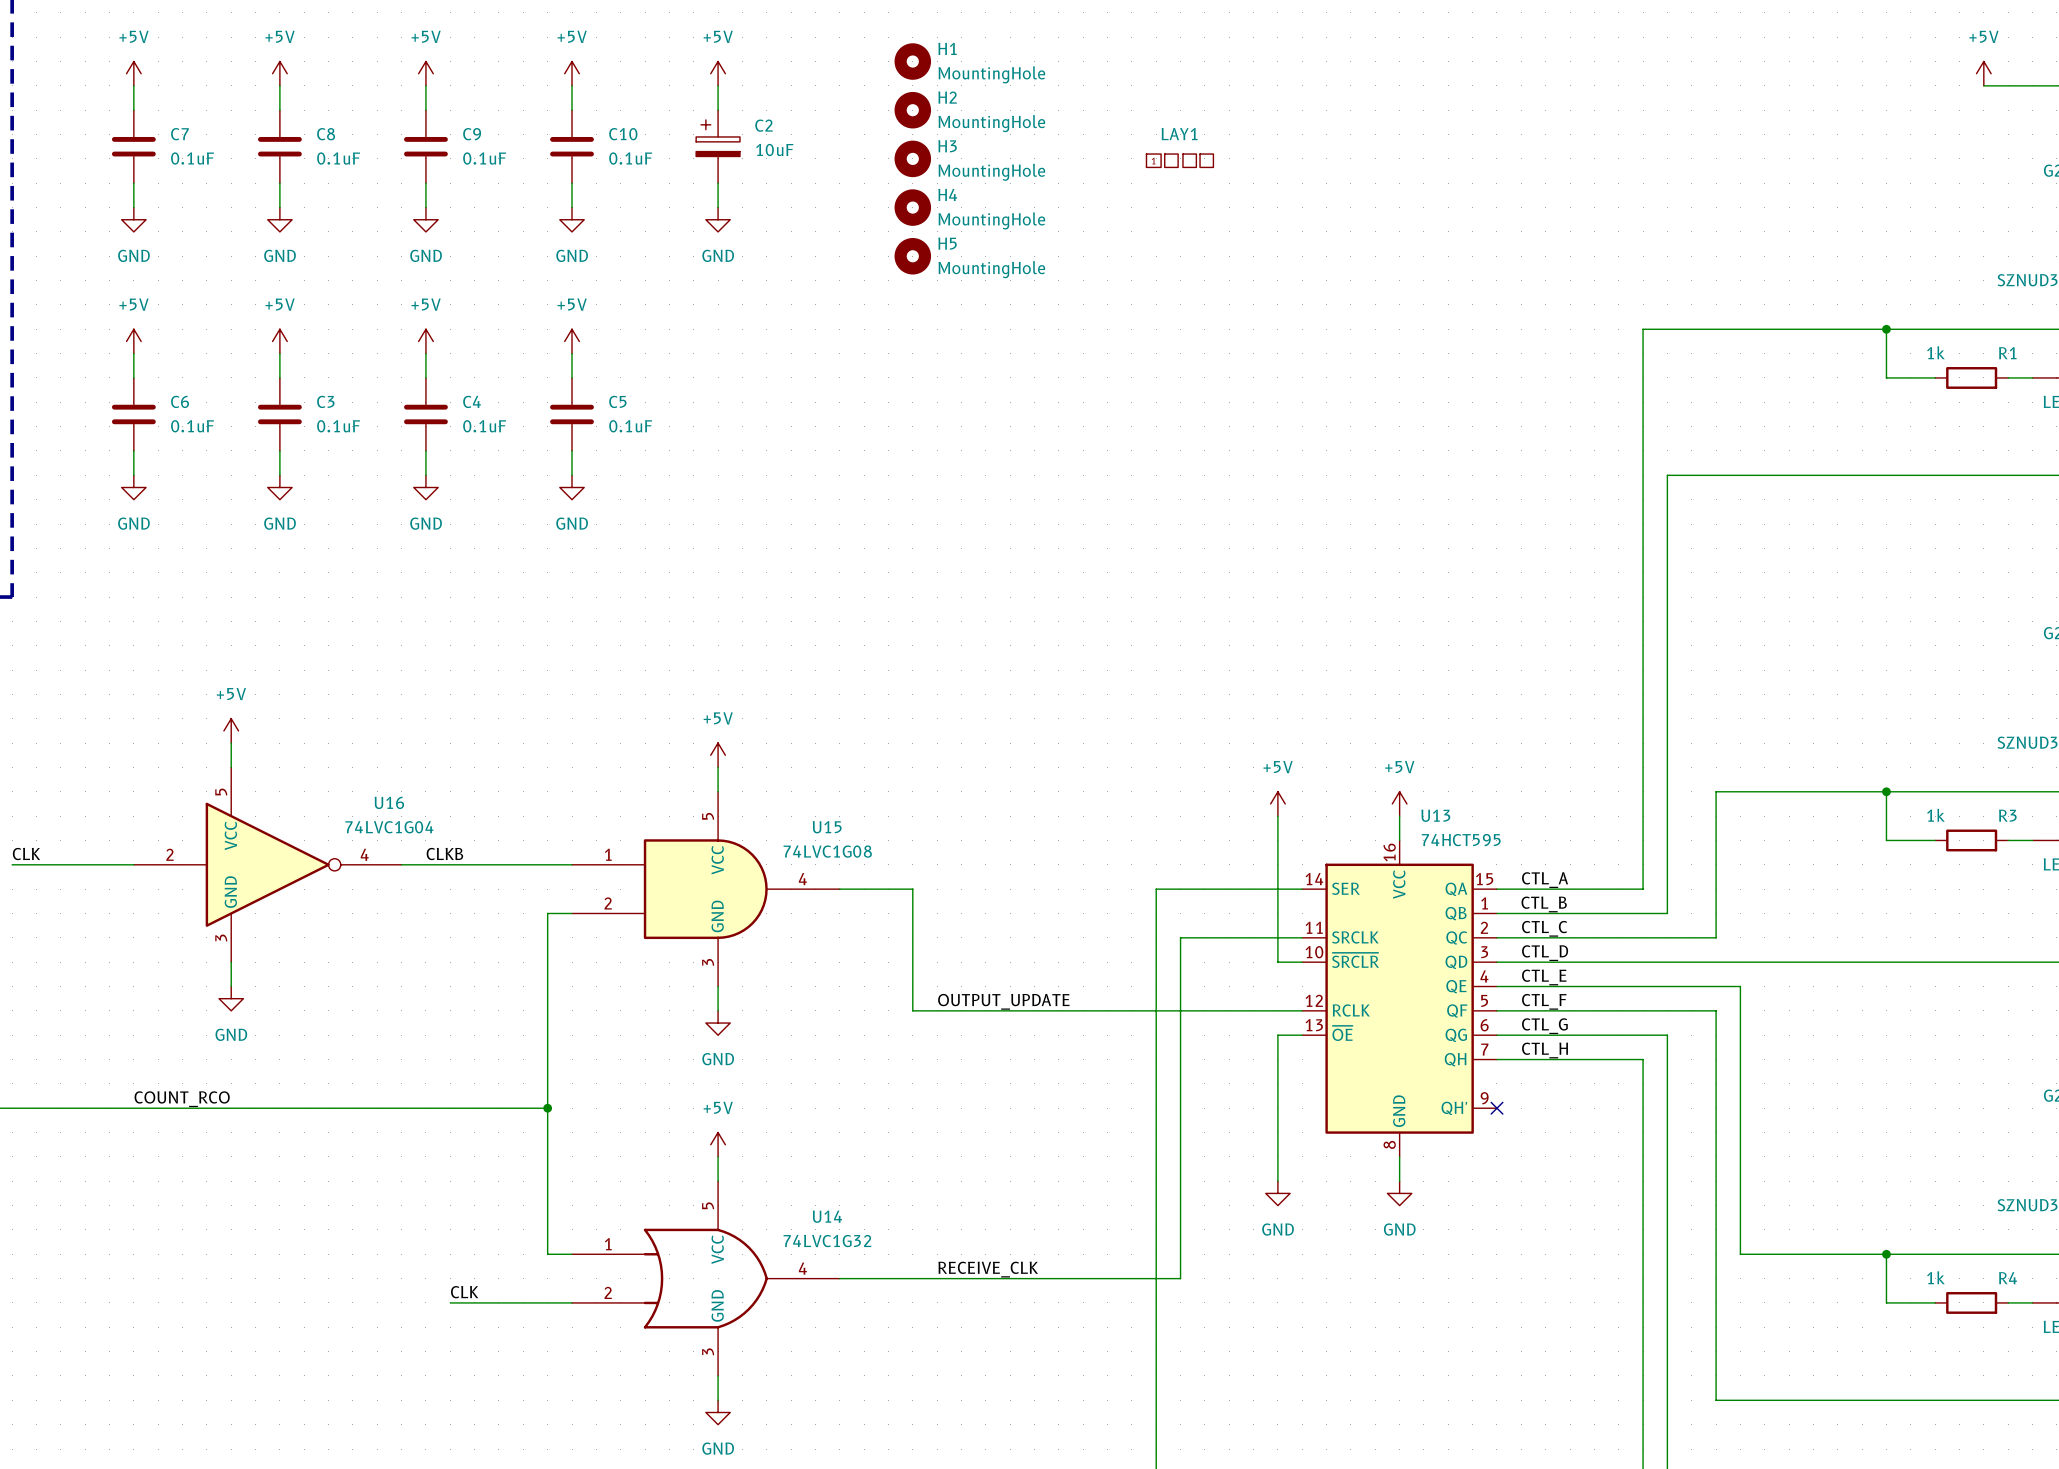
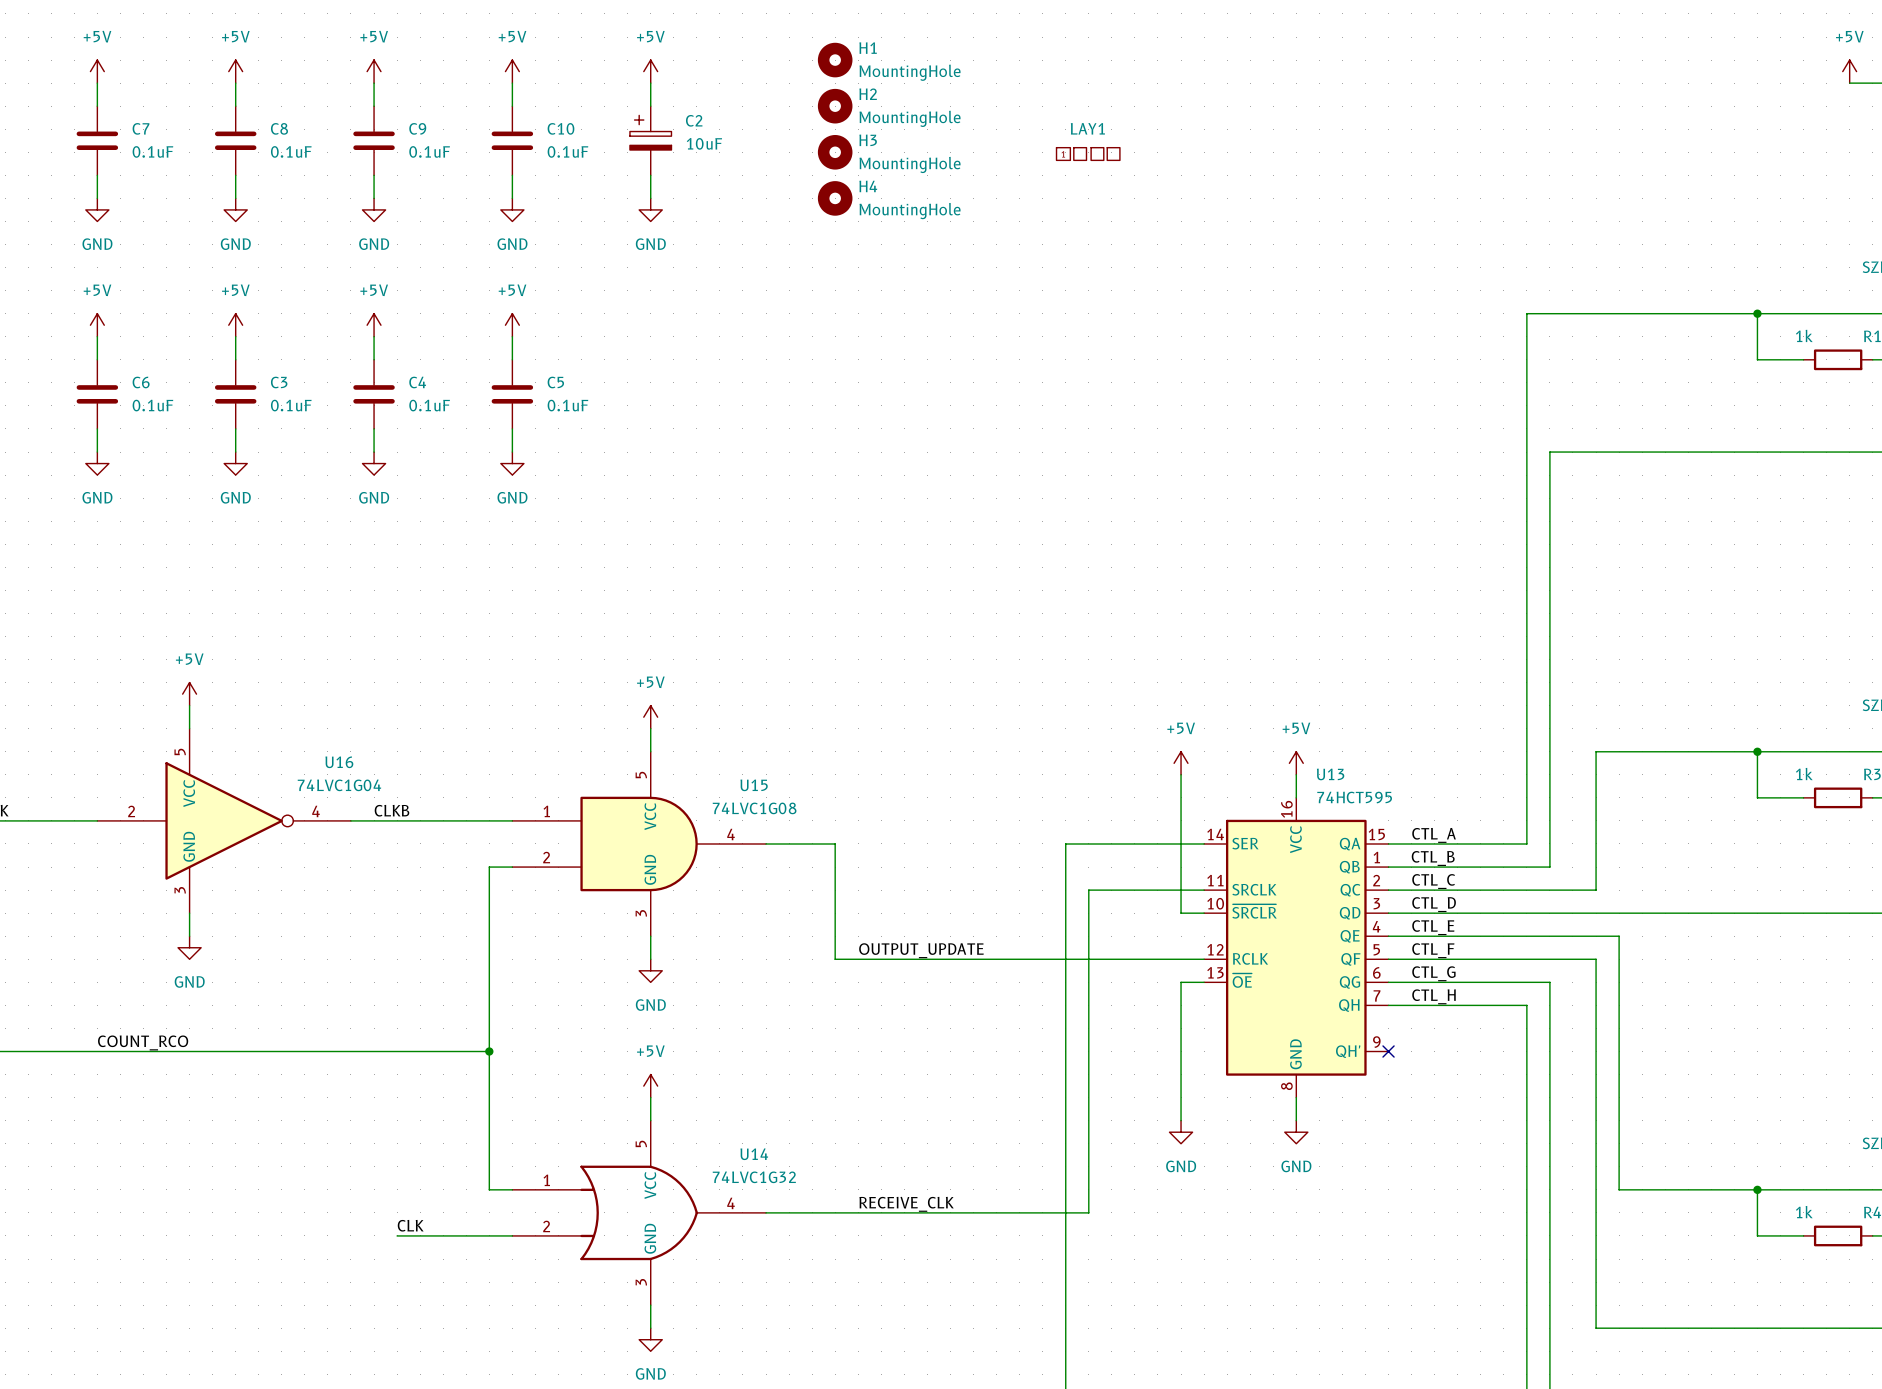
H5: MountingHole (912, 256) -> none

